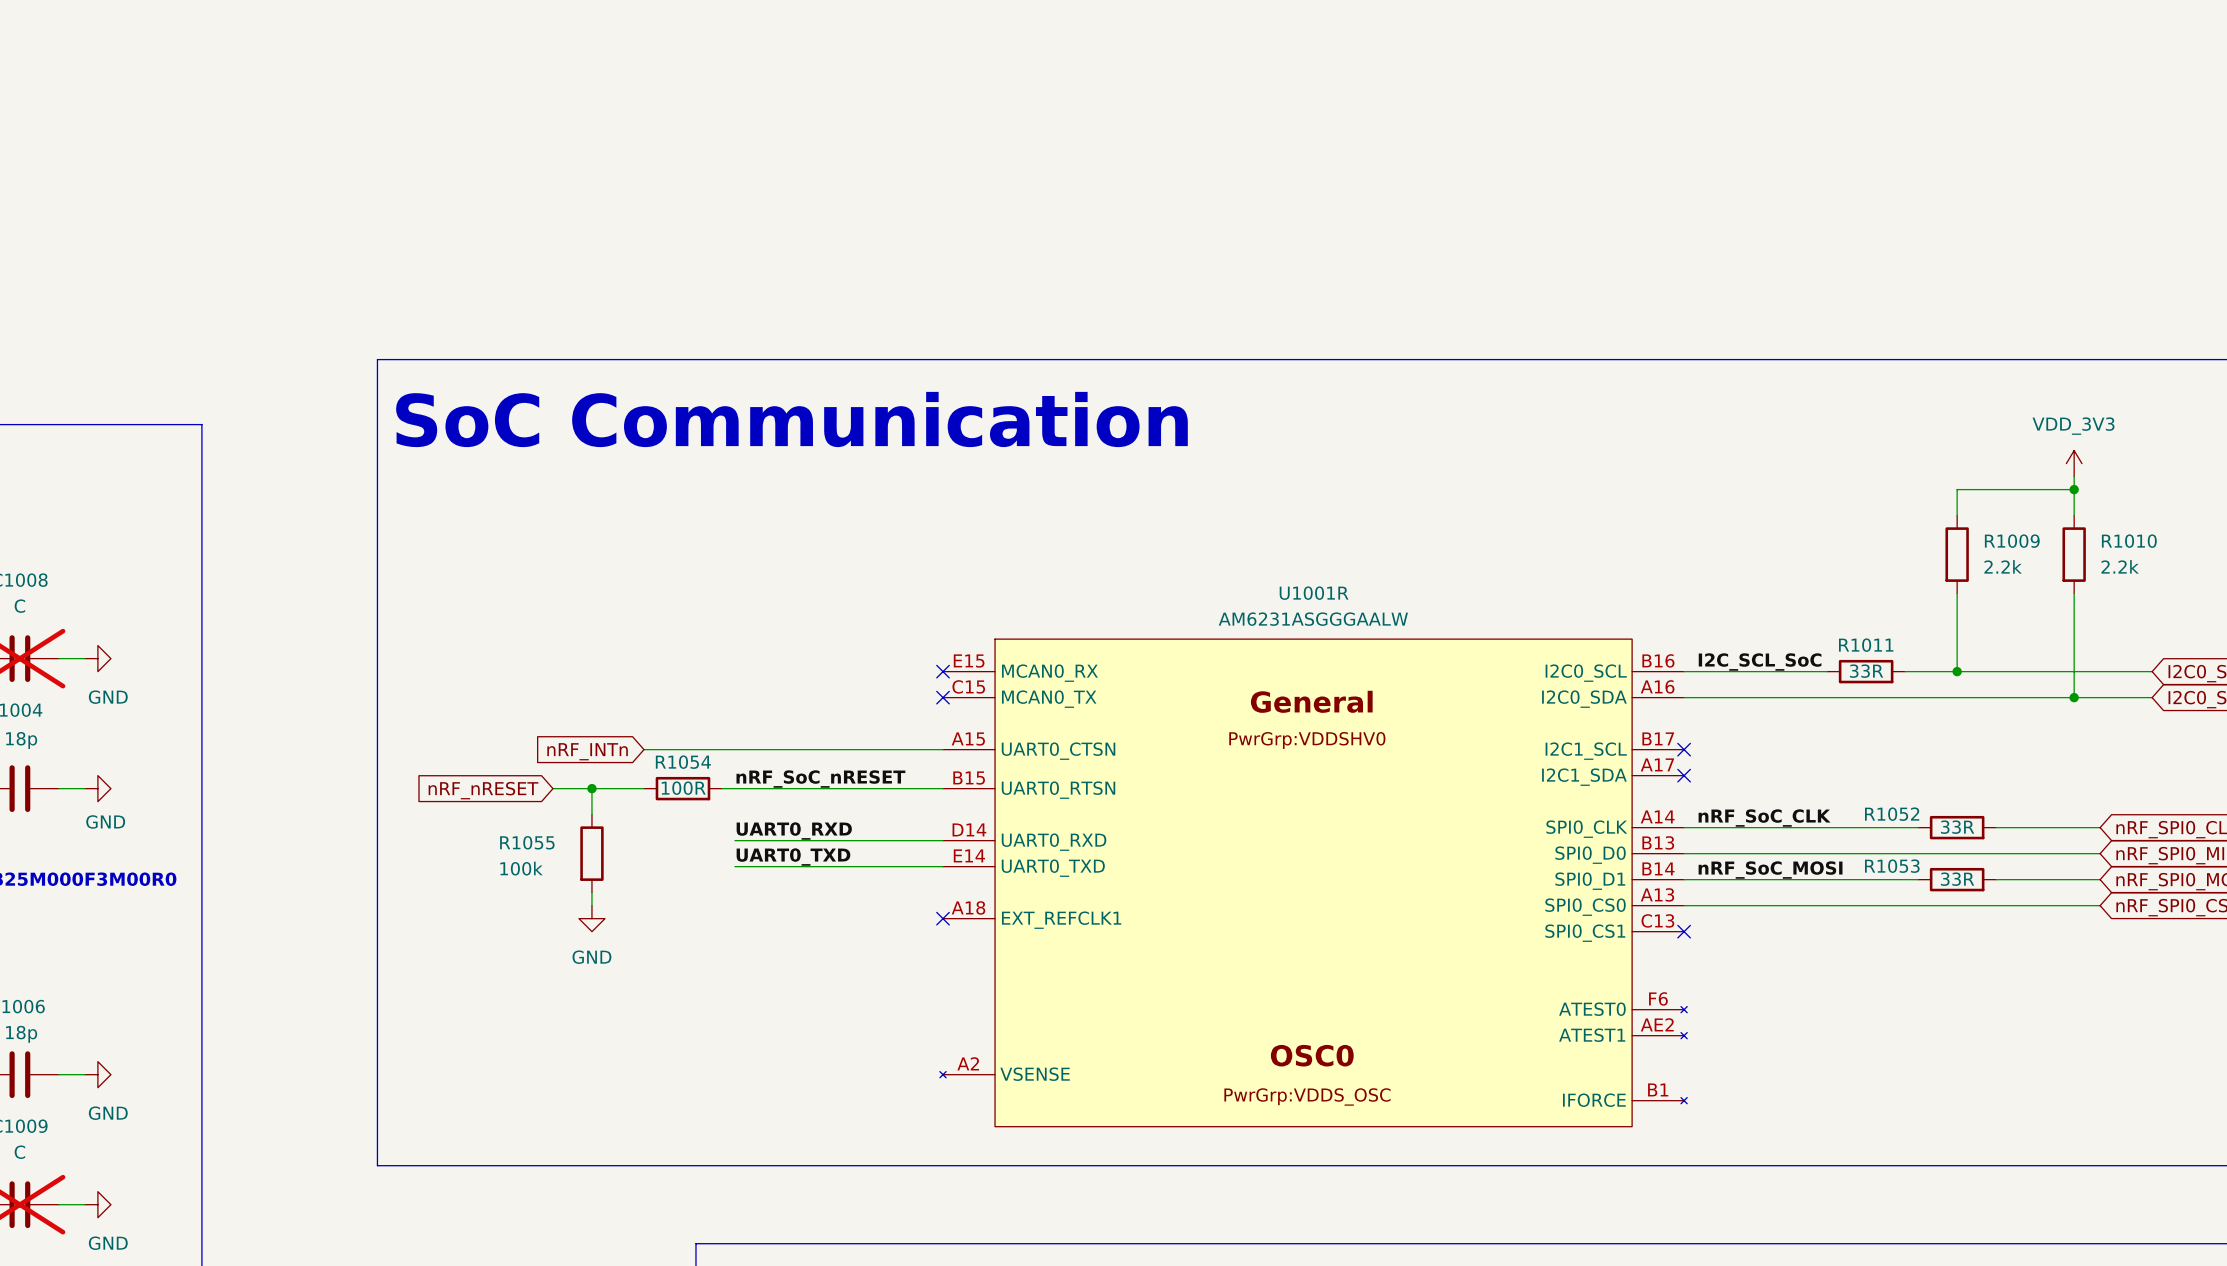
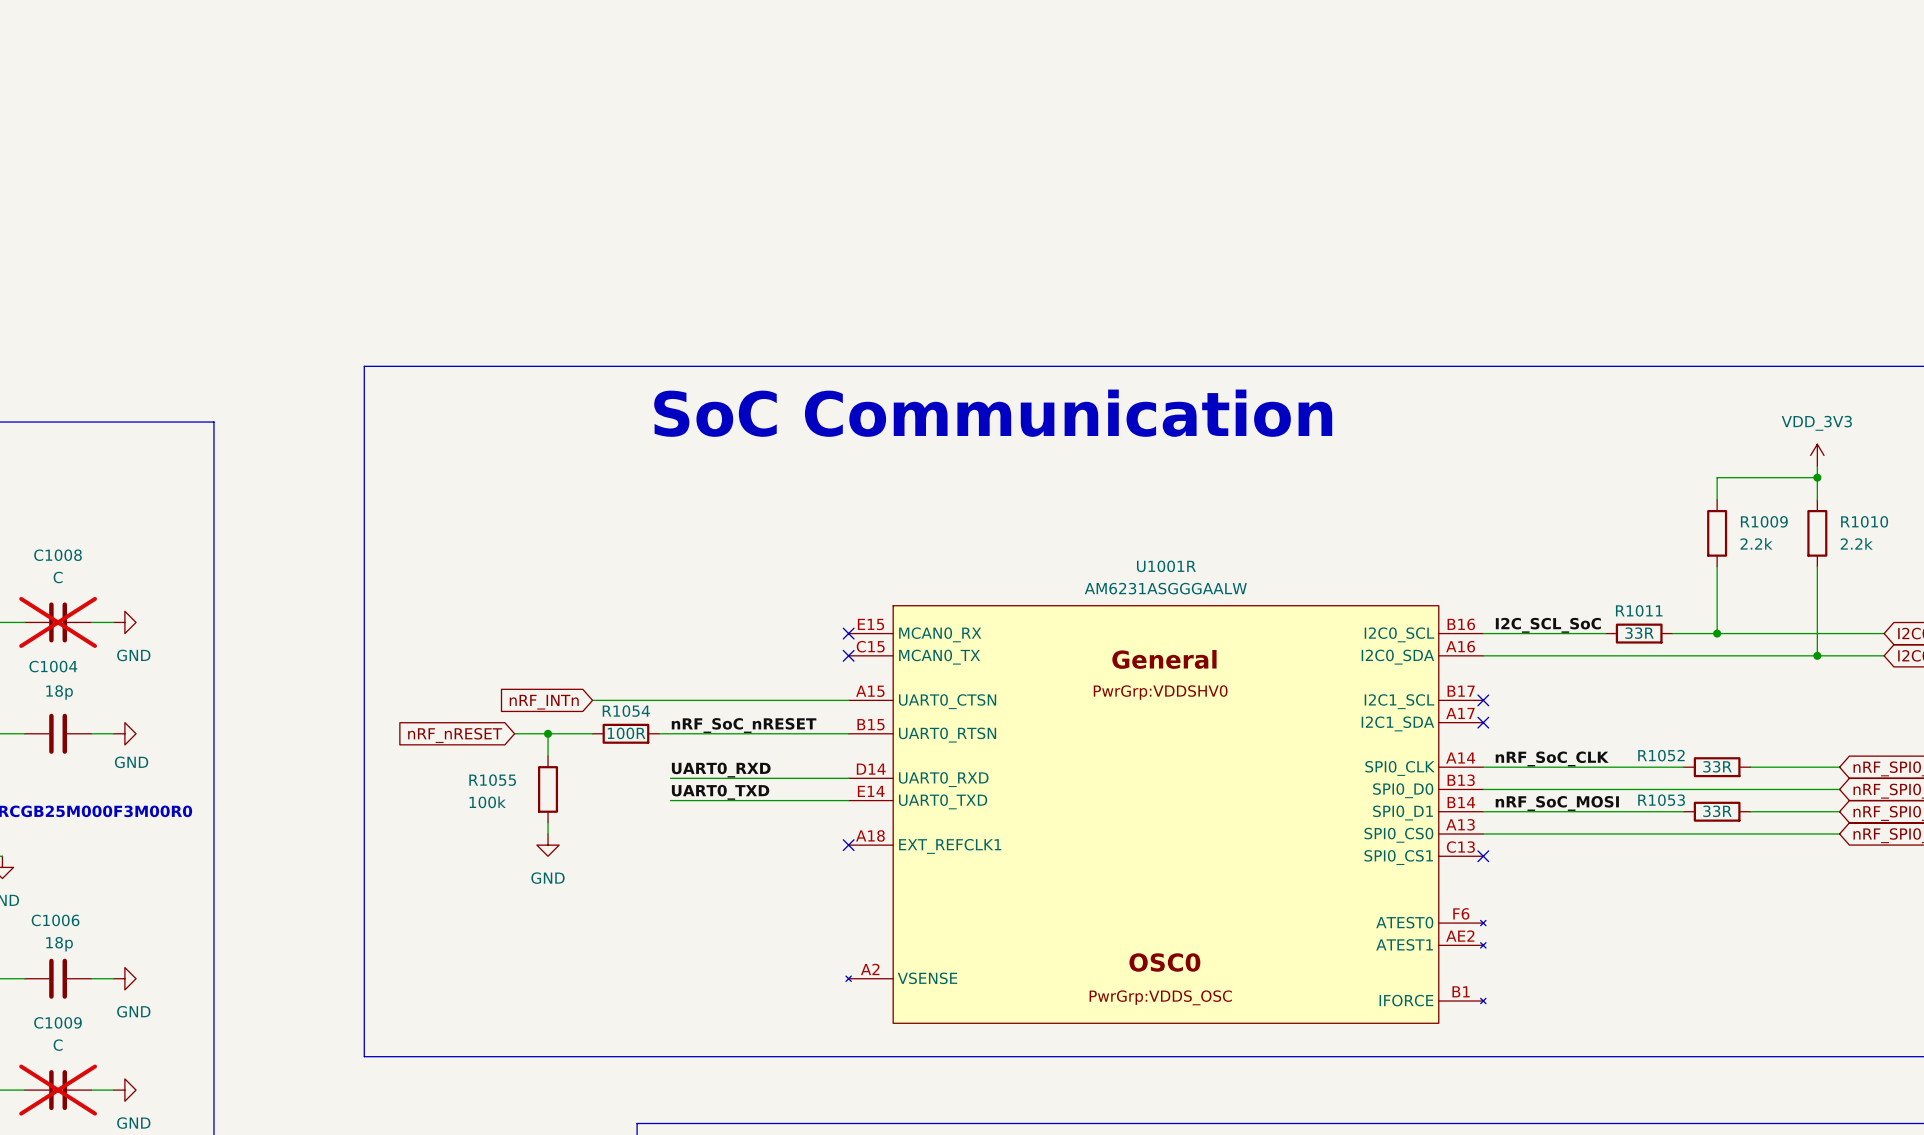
text: none -> SoC Communication (993, 413)
text: SoC Communication (791, 419) -> none

